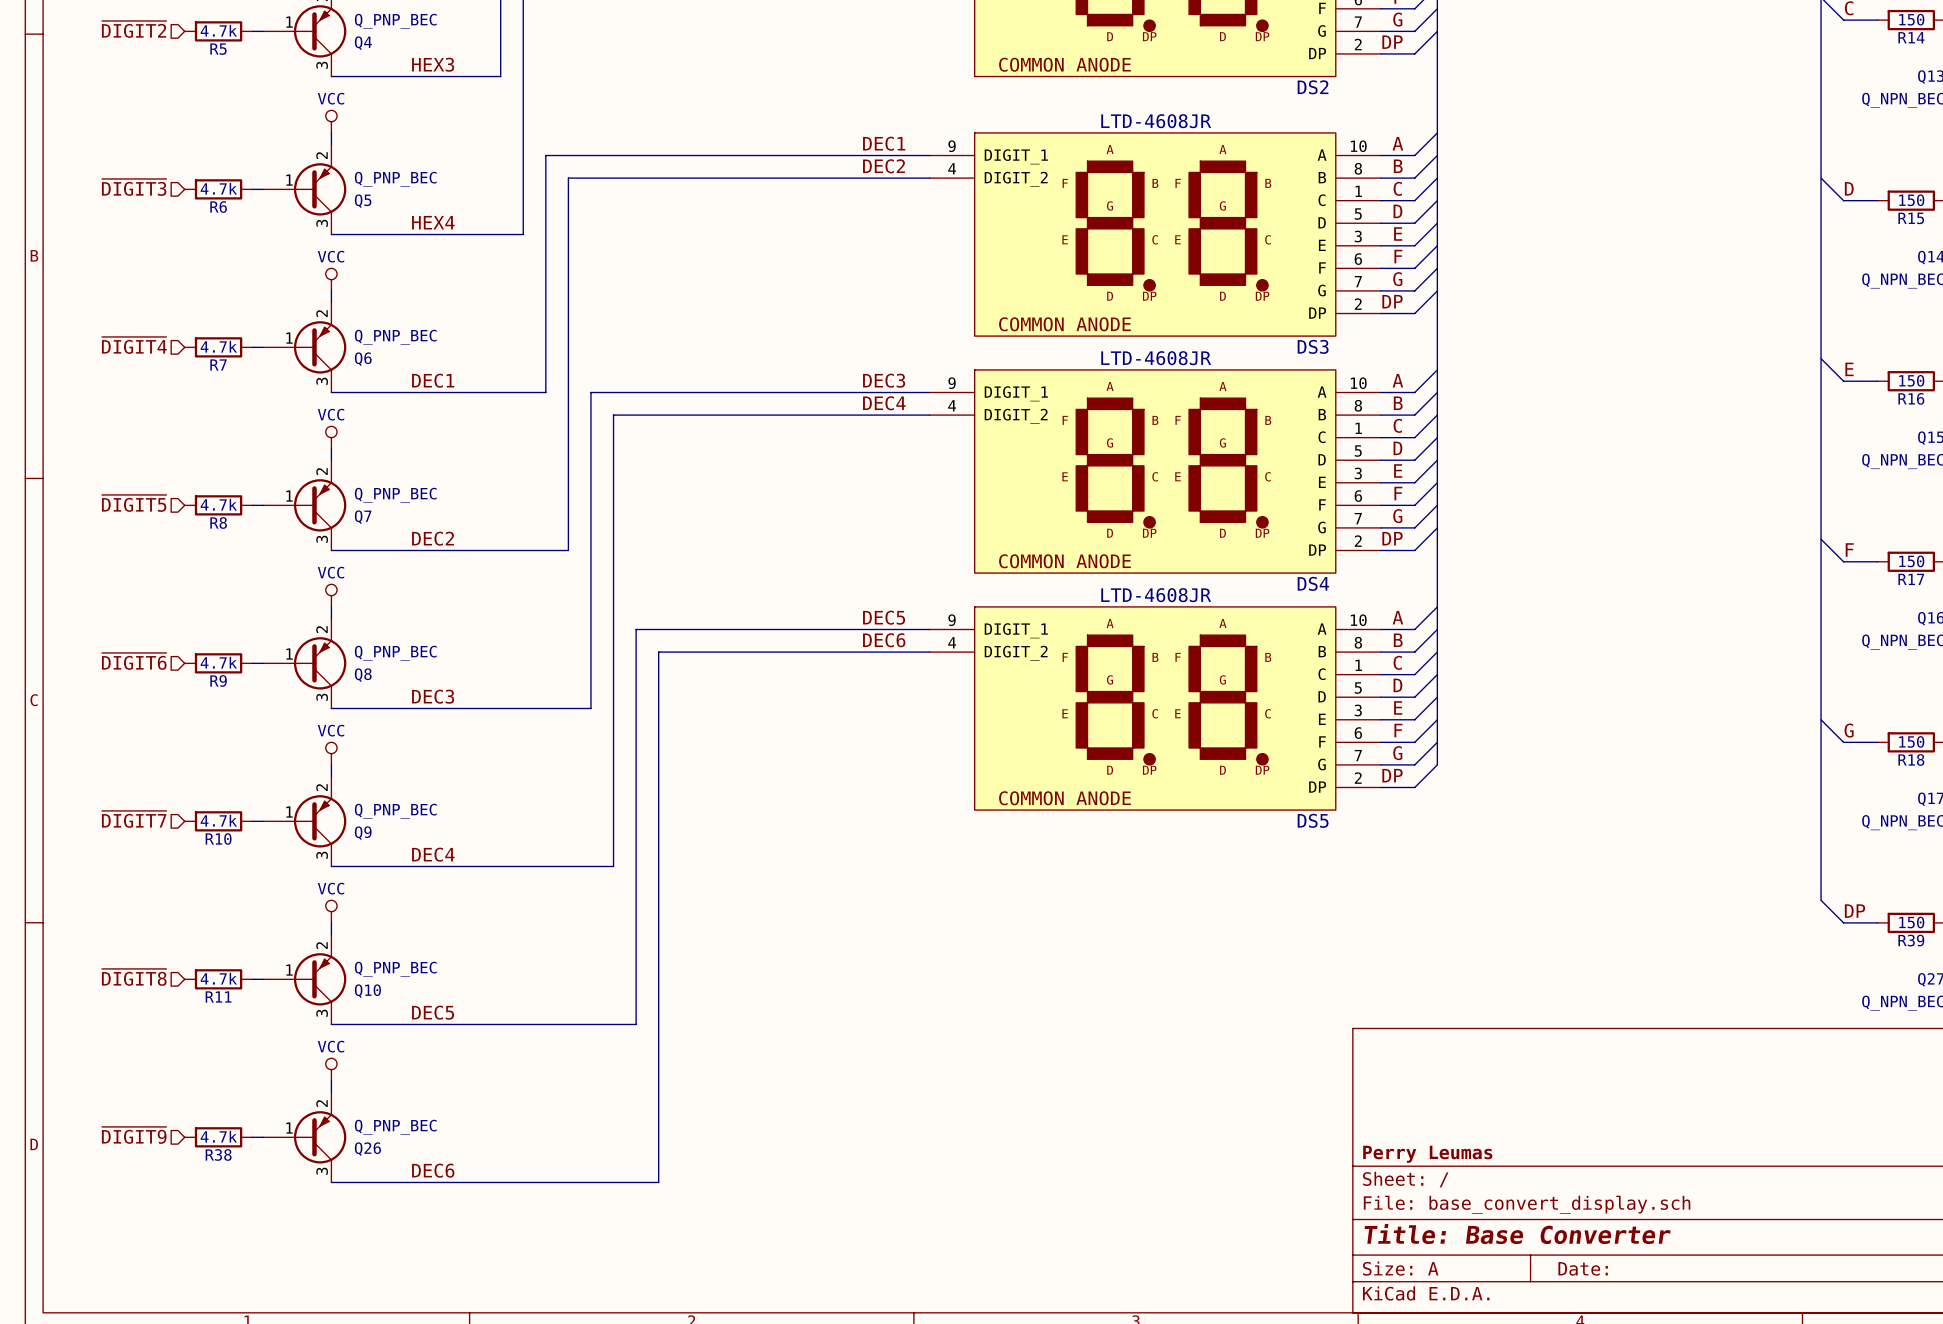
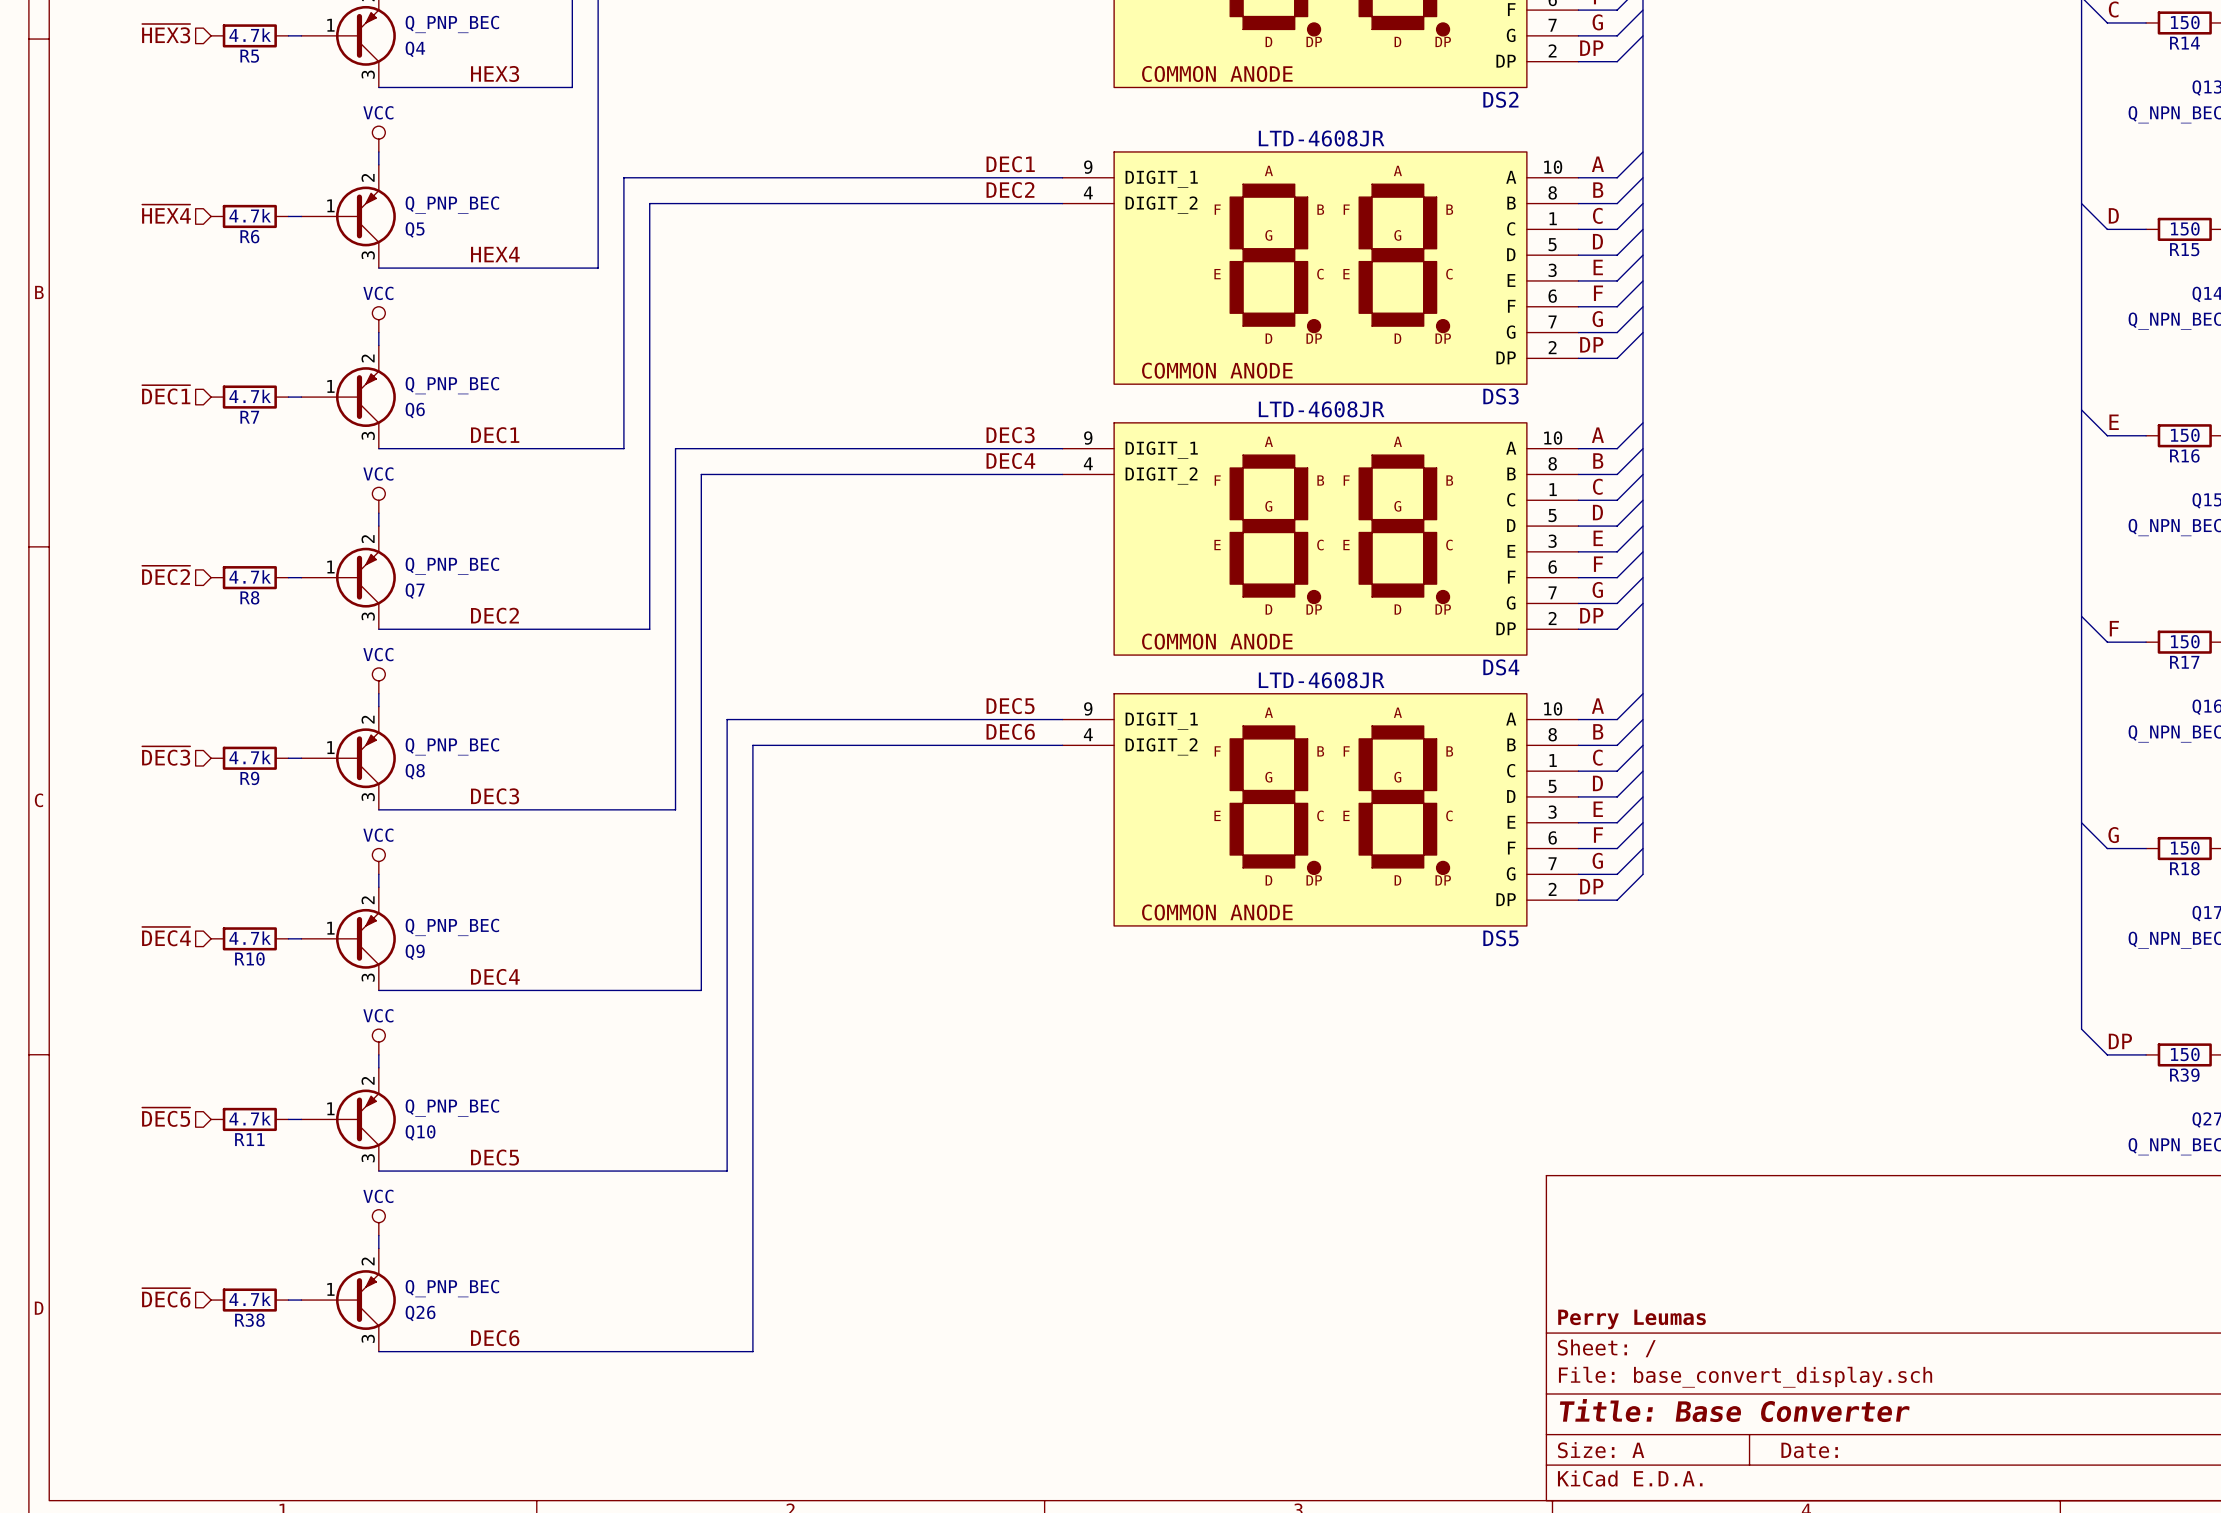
hierarchical label: ~{DIGIT2} (134, 29) -> ~{HEX3} (166, 33)
hierarchical label: ~{DIGIT3} (134, 187) -> ~{HEX4} (166, 214)
hierarchical label: ~{DIGIT4} (134, 345) -> ~{DEC1} (166, 394)
hierarchical label: ~{DIGIT5} (134, 503) -> ~{DEC2} (166, 575)
hierarchical label: ~{DIGIT6} (134, 661) -> ~{DEC3} (166, 756)
hierarchical label: ~{DIGIT7} (134, 819) -> ~{DEC4} (166, 936)
hierarchical label: ~{DIGIT8} (134, 977) -> ~{DEC5} (166, 1117)
hierarchical label: ~{DIGIT9} (134, 1135) -> ~{DEC6} (166, 1297)

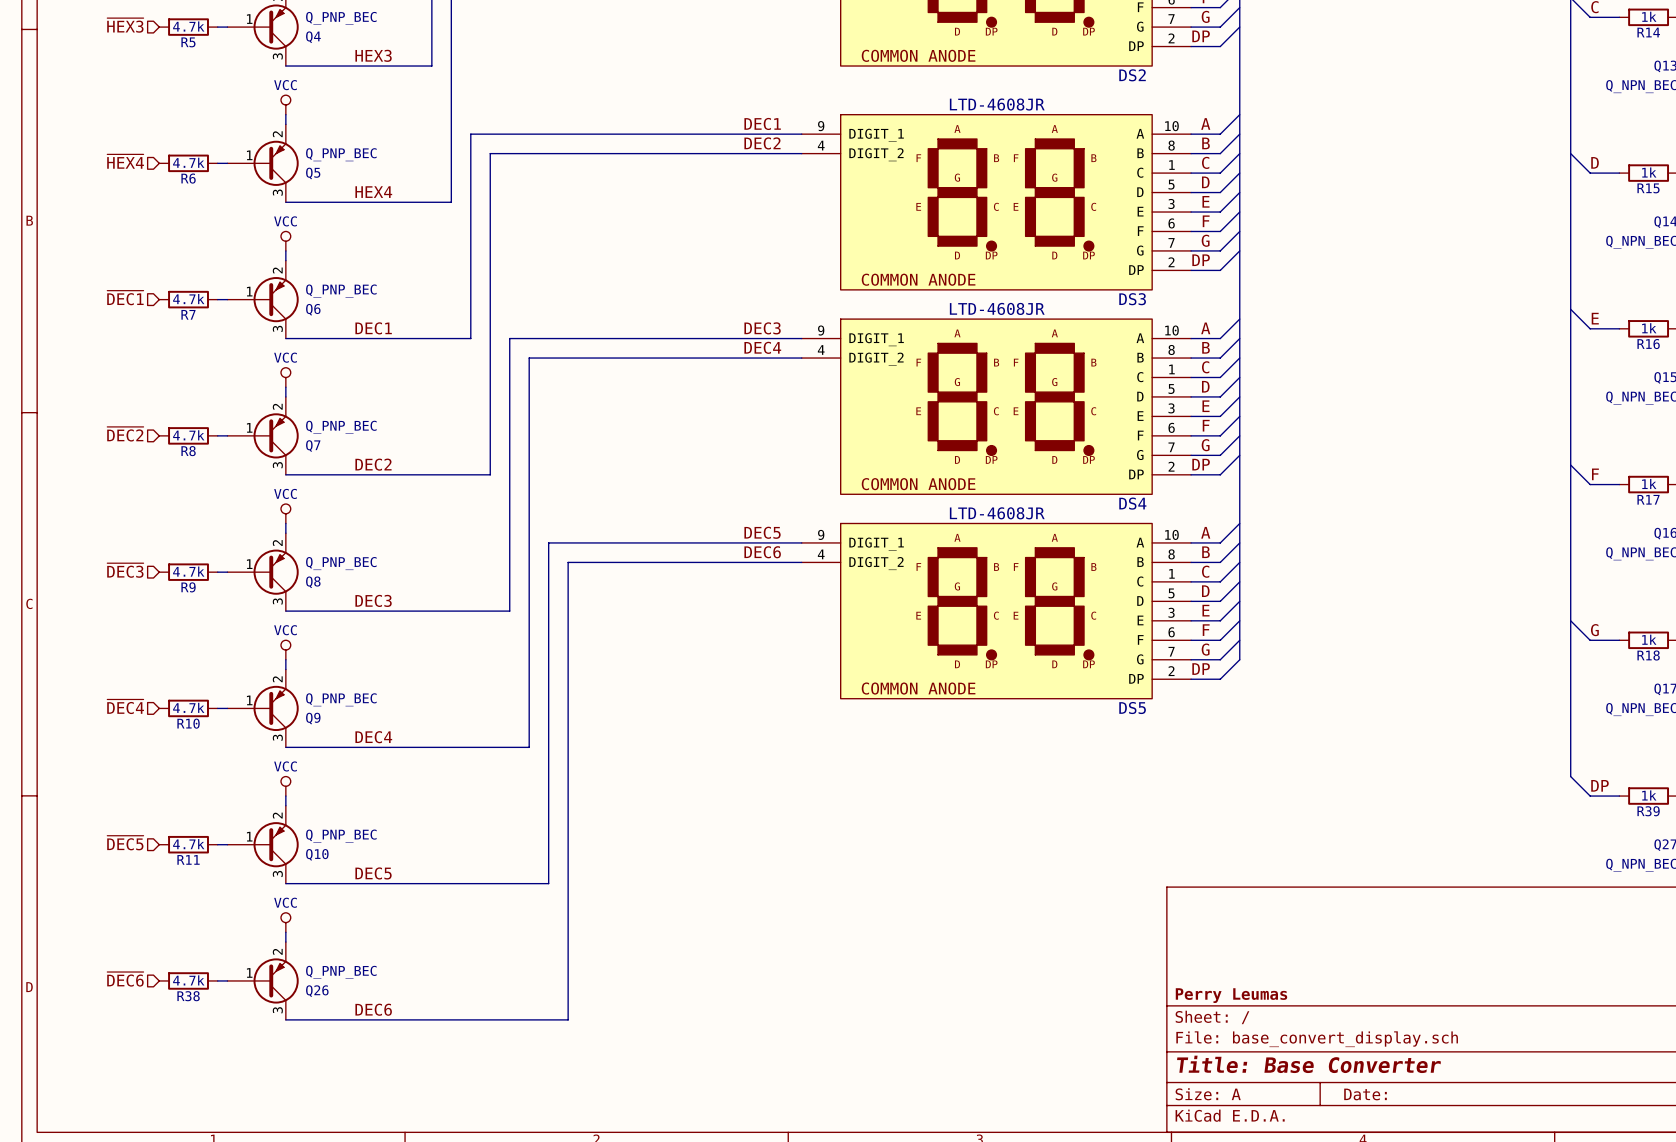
R14 value: 150 (2185, 22) -> 1k (1649, 16)
R15 value: 150 (2185, 228) -> 1k (1649, 172)
R16 value: 150 (2185, 435) -> 1k (1649, 328)
R17 value: 150 (2185, 641) -> 1k (1649, 483)
R18 value: 150 (2185, 848) -> 1k (1649, 639)
R39 value: 150 (2185, 1054) -> 1k (1649, 795)

